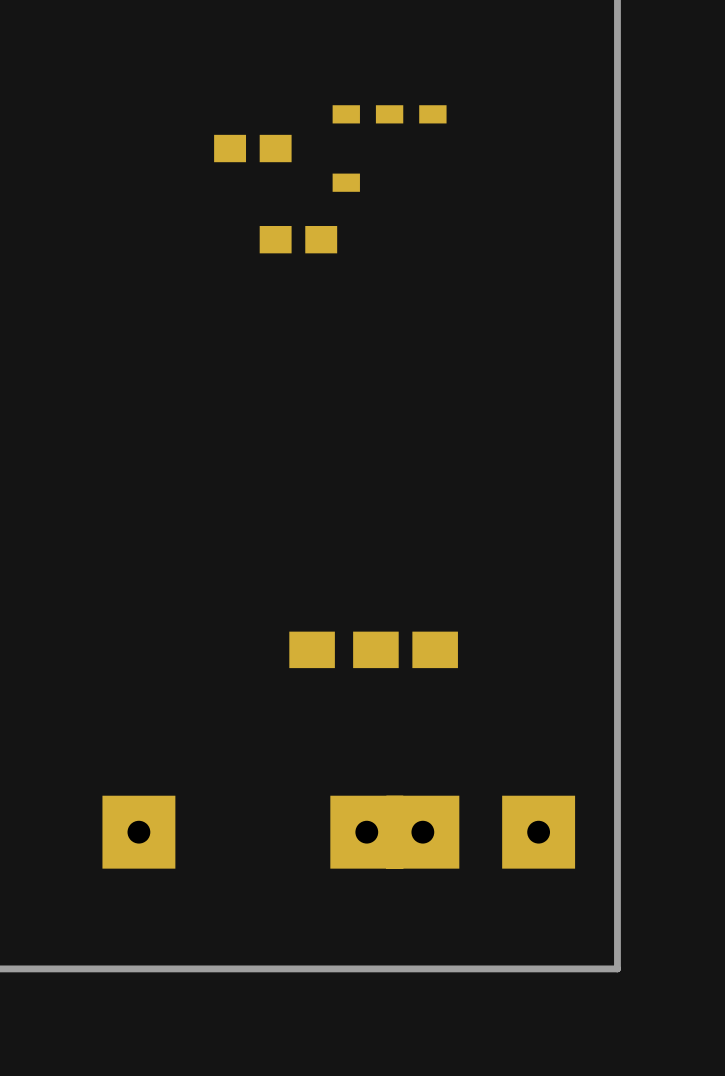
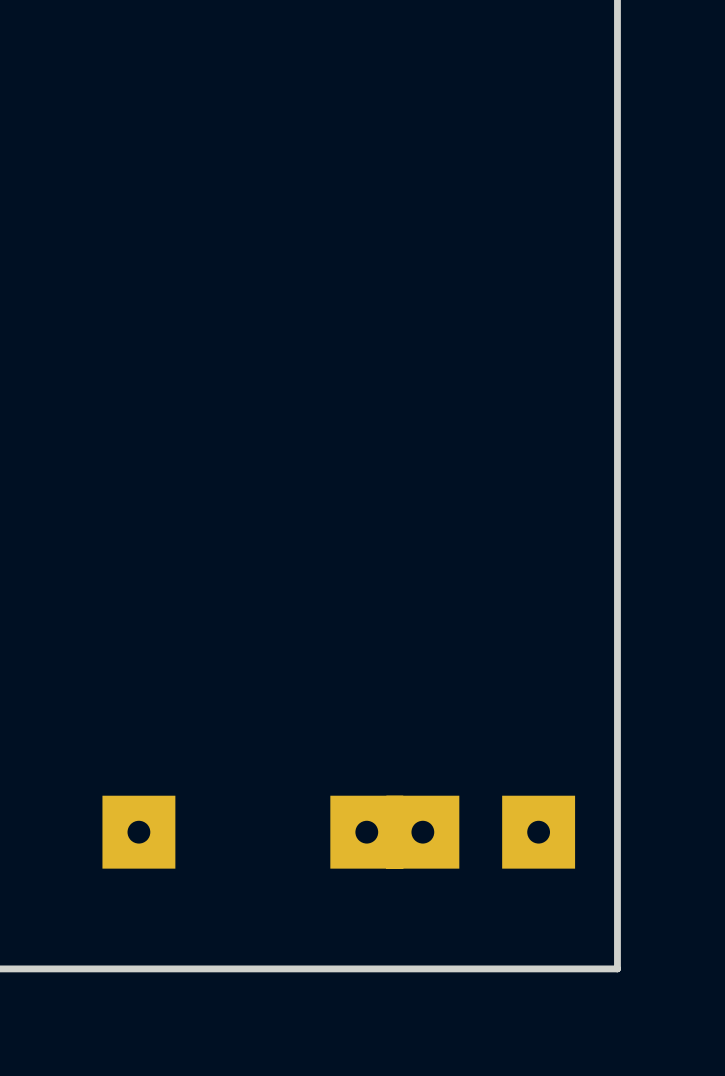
part: (252, 148) -> none
part: (389, 148) -> none
part: (298, 239) -> none
part: (373, 649) -> none

